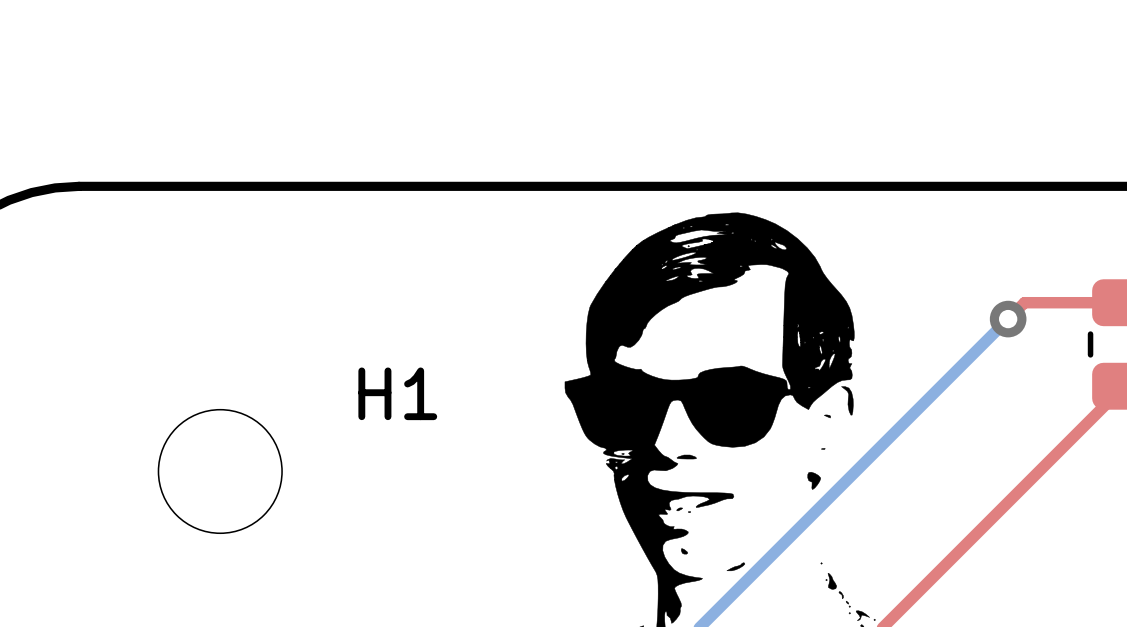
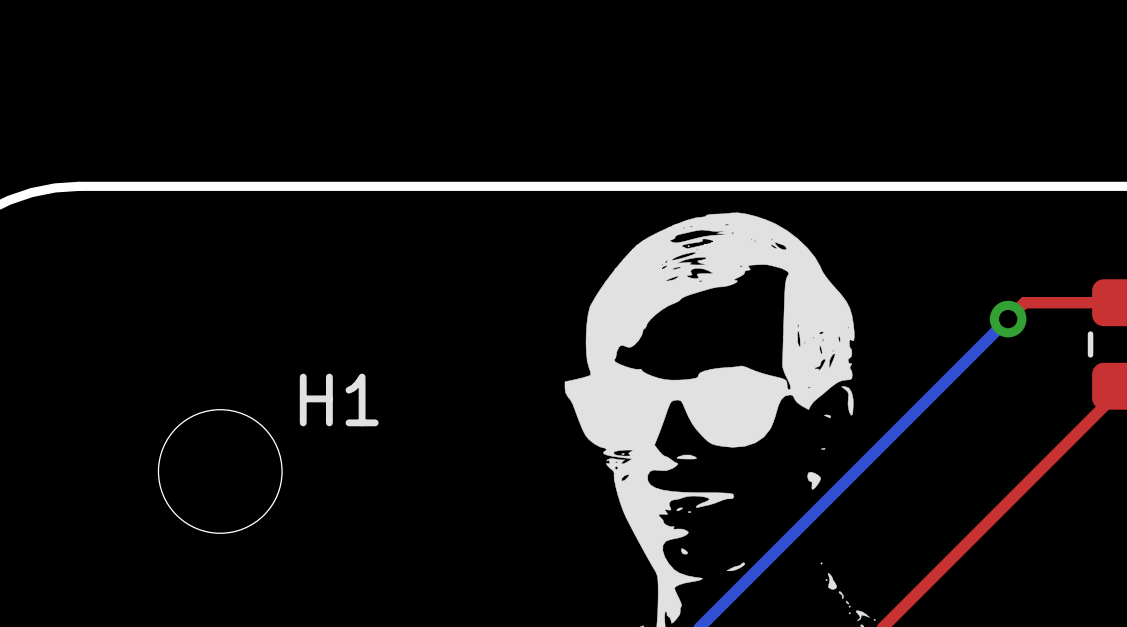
H1 name position: H1 (397, 393) -> H1 (339, 399)

